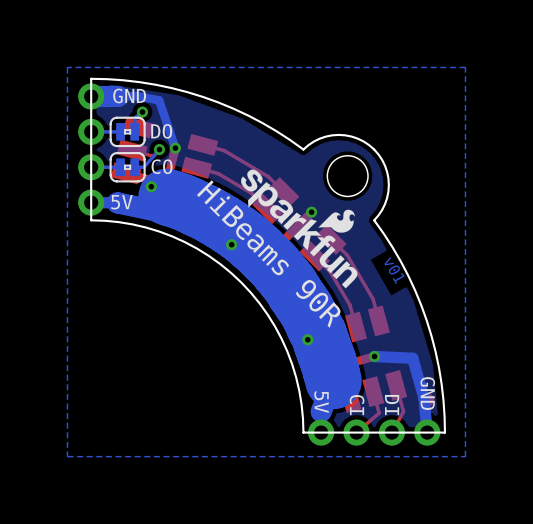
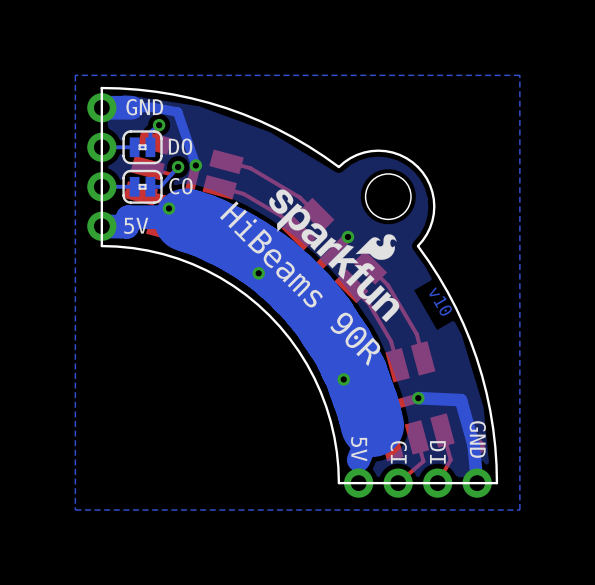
bottom track: (91, 202) (117, 202) (158, 211) -> (101, 226) (127, 226) (127, 217) (176, 217) (176, 213)
text: v01 (394, 270) -> v10 (440, 301)

